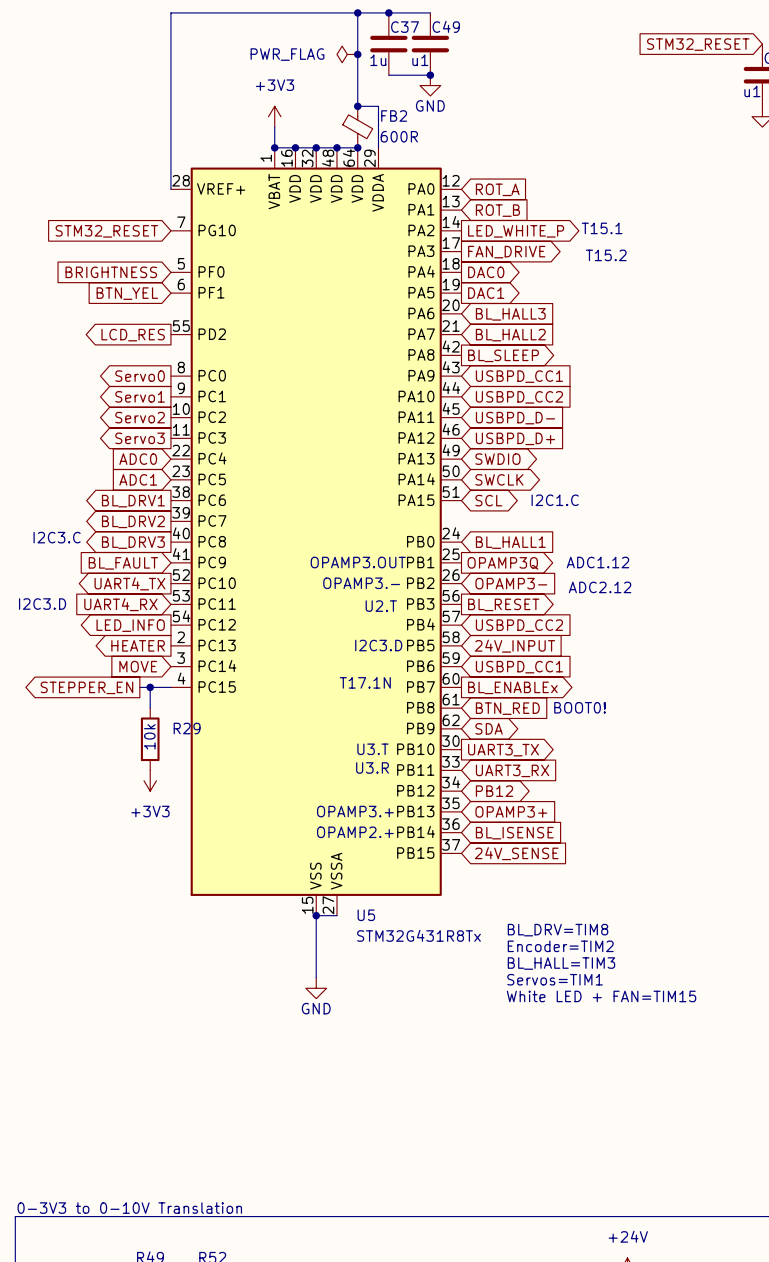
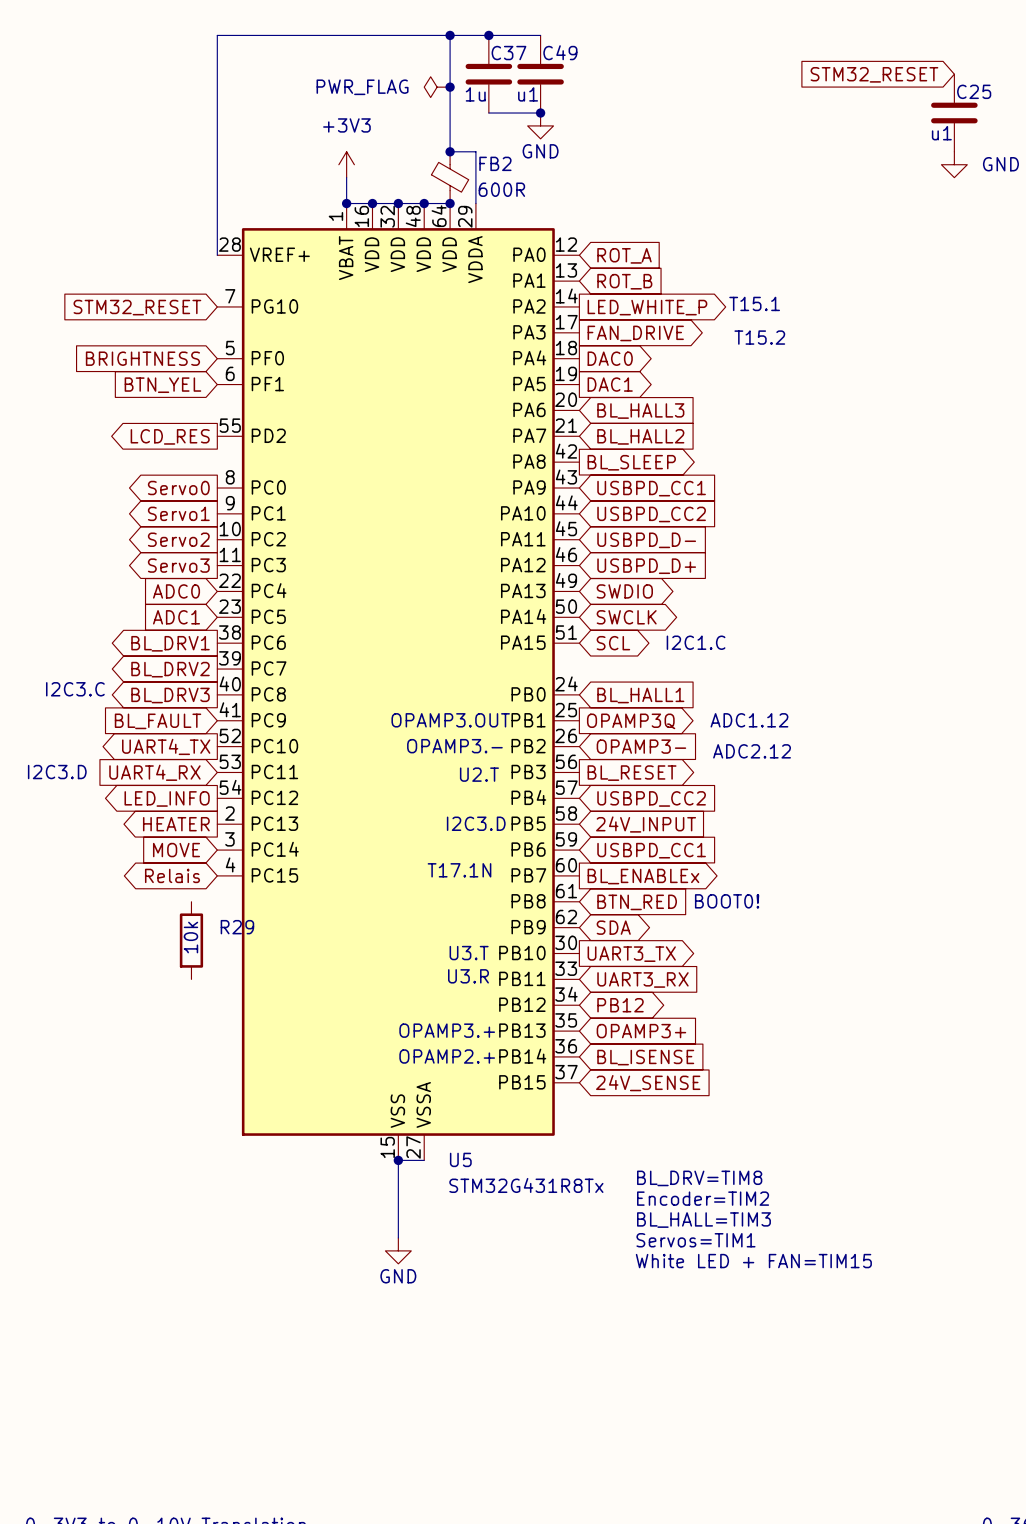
global label: STEPPER_EN (86, 687) -> none
global label: none -> Relais (172, 875)
wire: (139, 687) (170, 687) -> none
wire: (150, 687) (150, 708) -> none
junction: (150, 687) -> none
power symbol: +3V3 (150, 780) -> none

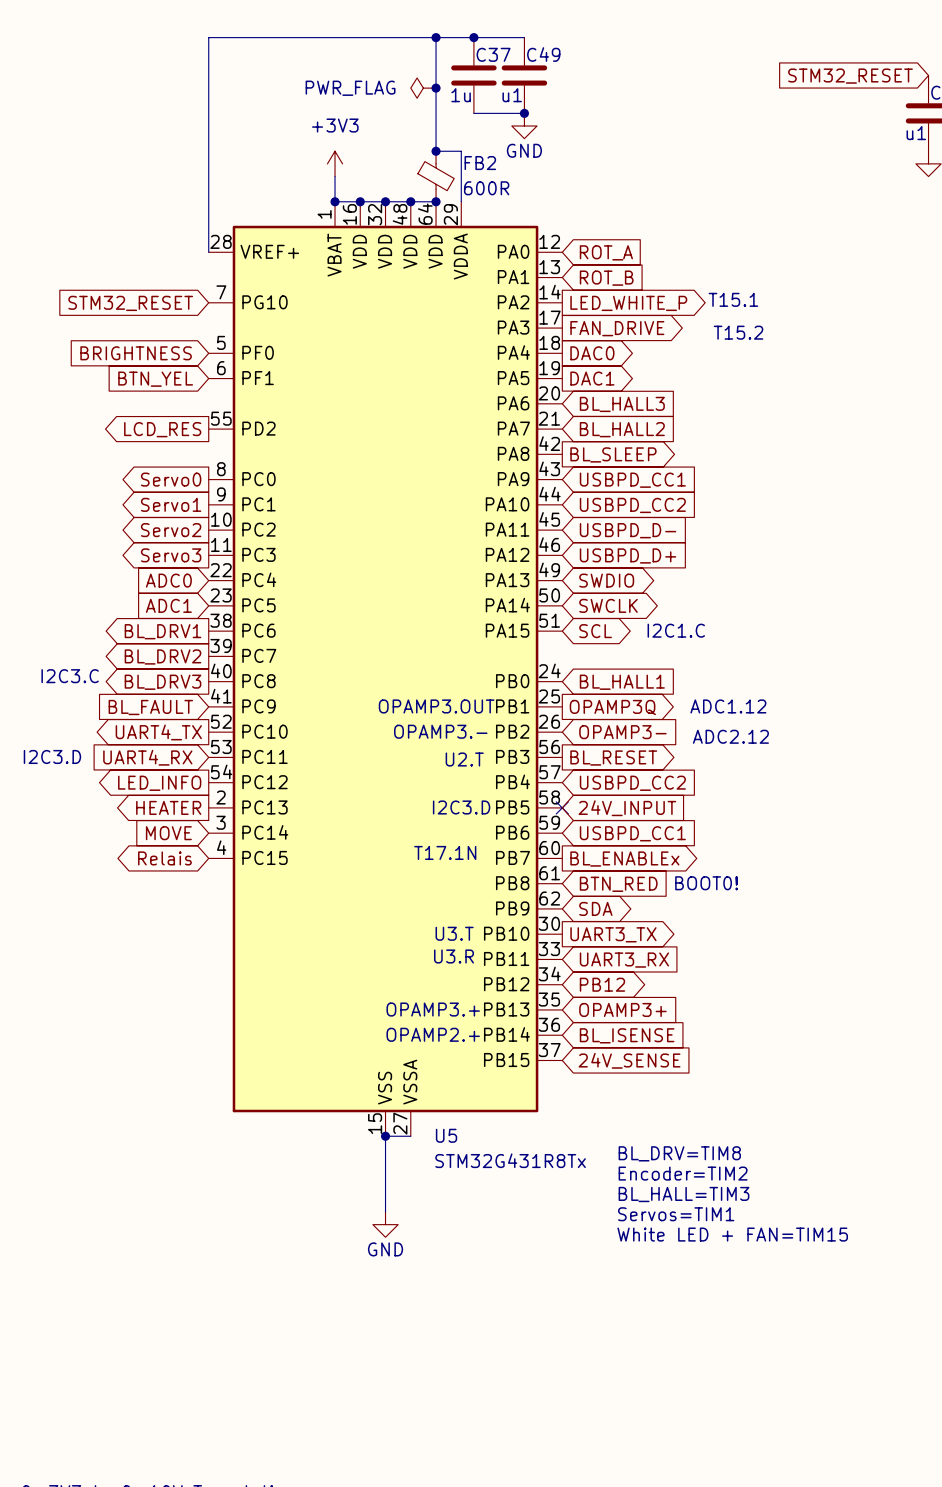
no-connect mark: none -> (562, 807)
R29: 10k (191, 940) -> none

